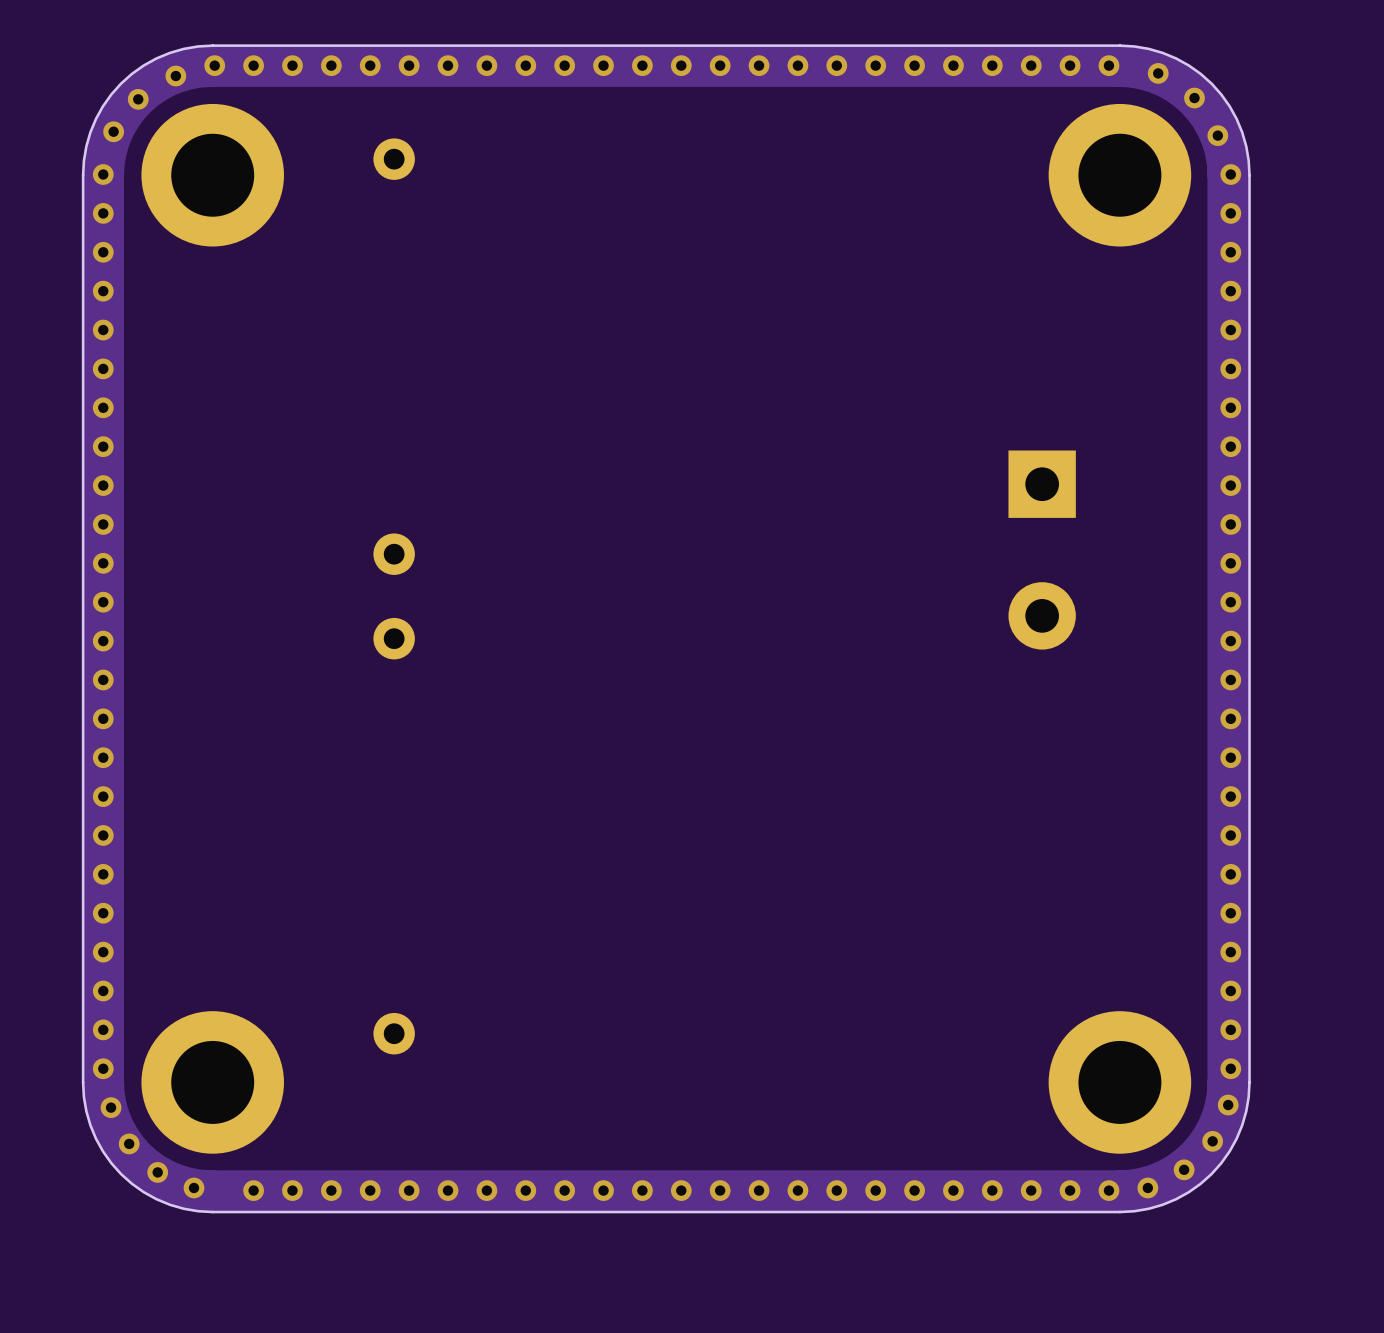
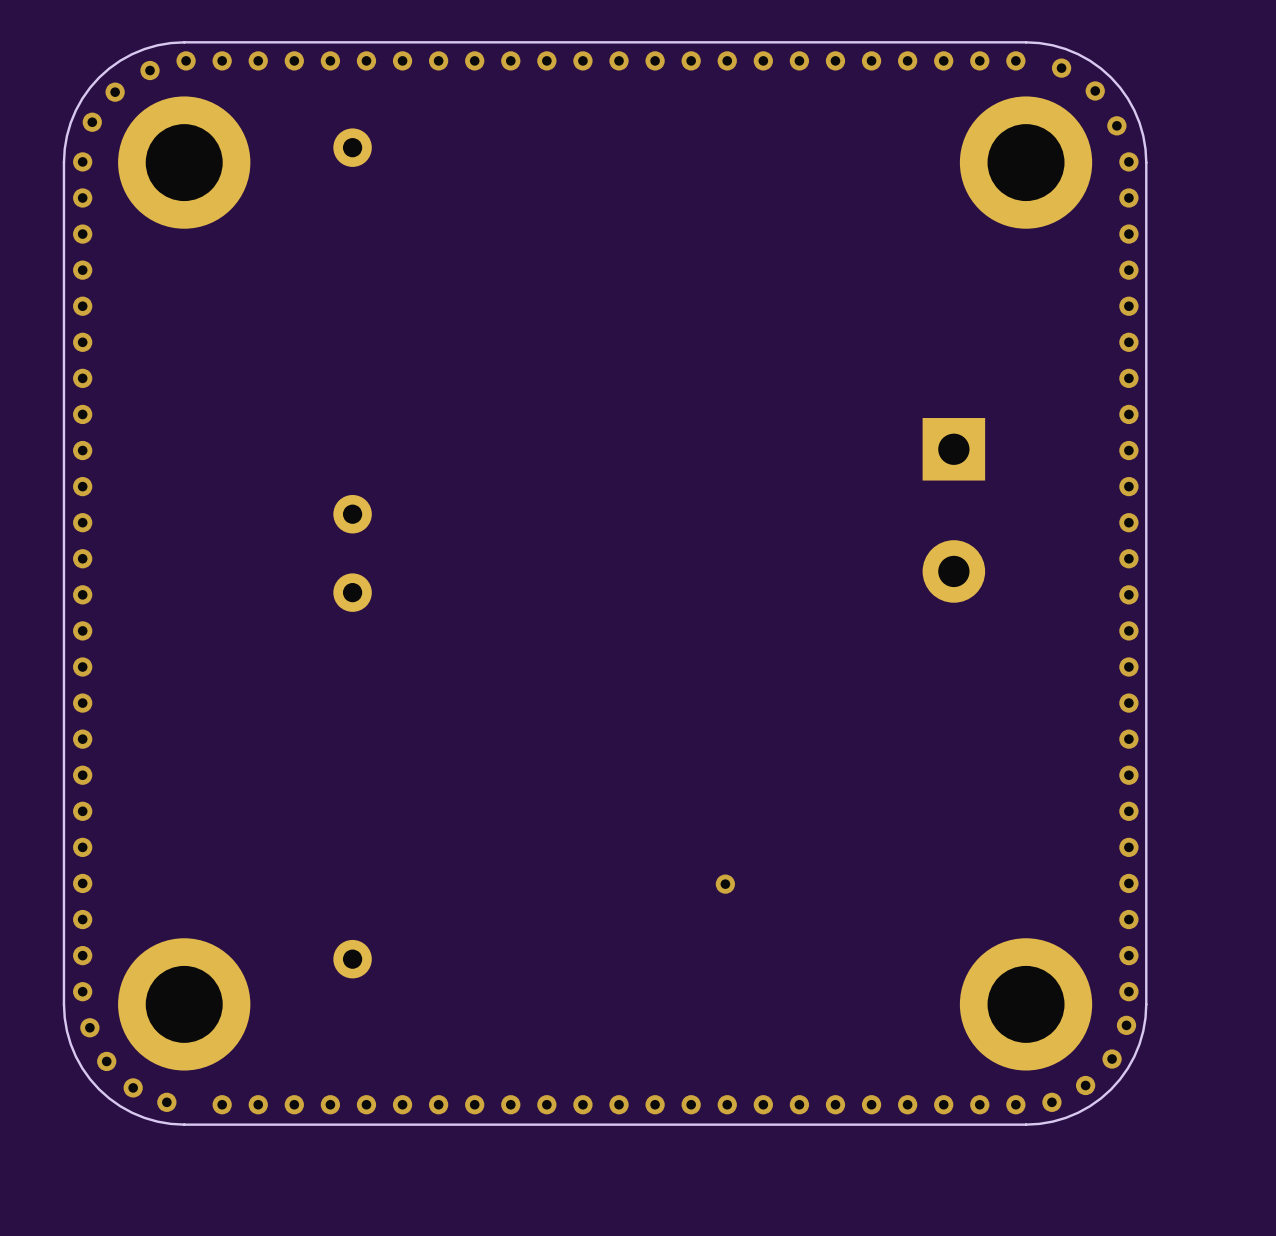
track: (1119, 66) (212, 66) (187, 68) (164, 76) (144, 89) (127, 107) (109, 139) (103, 175) (103, 1082) (106, 1106) (114, 1129) (127, 1150) (144, 1167) (176, 1184) (212, 1191) (1119, 1191) (1143, 1188) (1166, 1180) (1187, 1167) (1204, 1150) (1222, 1118) (1228, 1082) (1227, 162) (1217, 127) (1196, 98) (1166, 76) (1143, 68) (1119, 66) -> none
via: none -> (725, 884)

